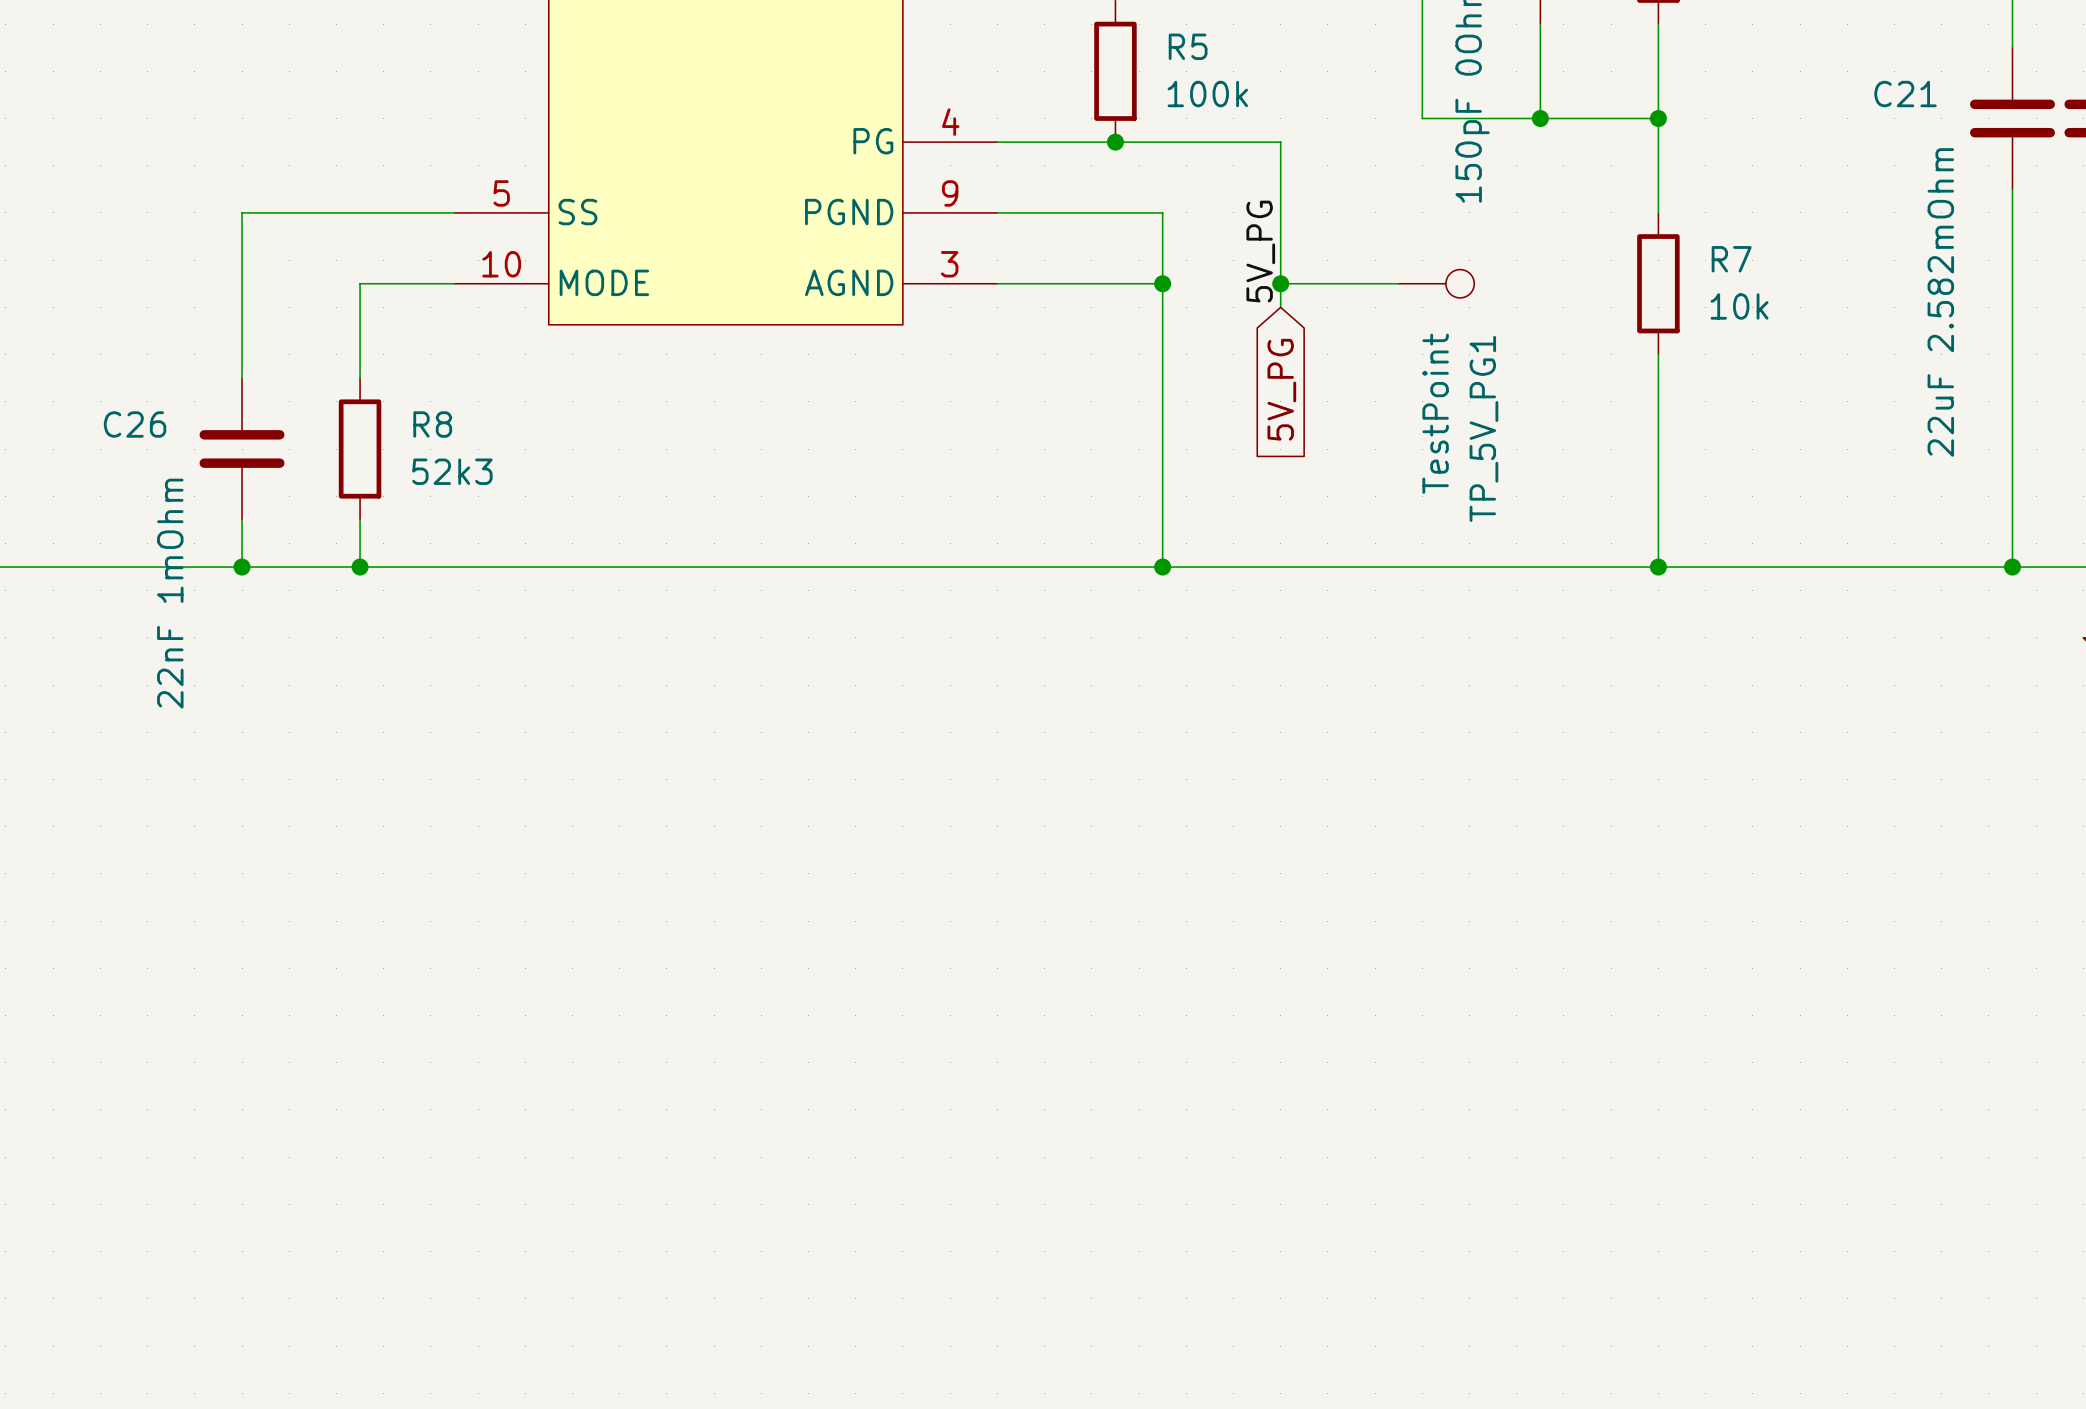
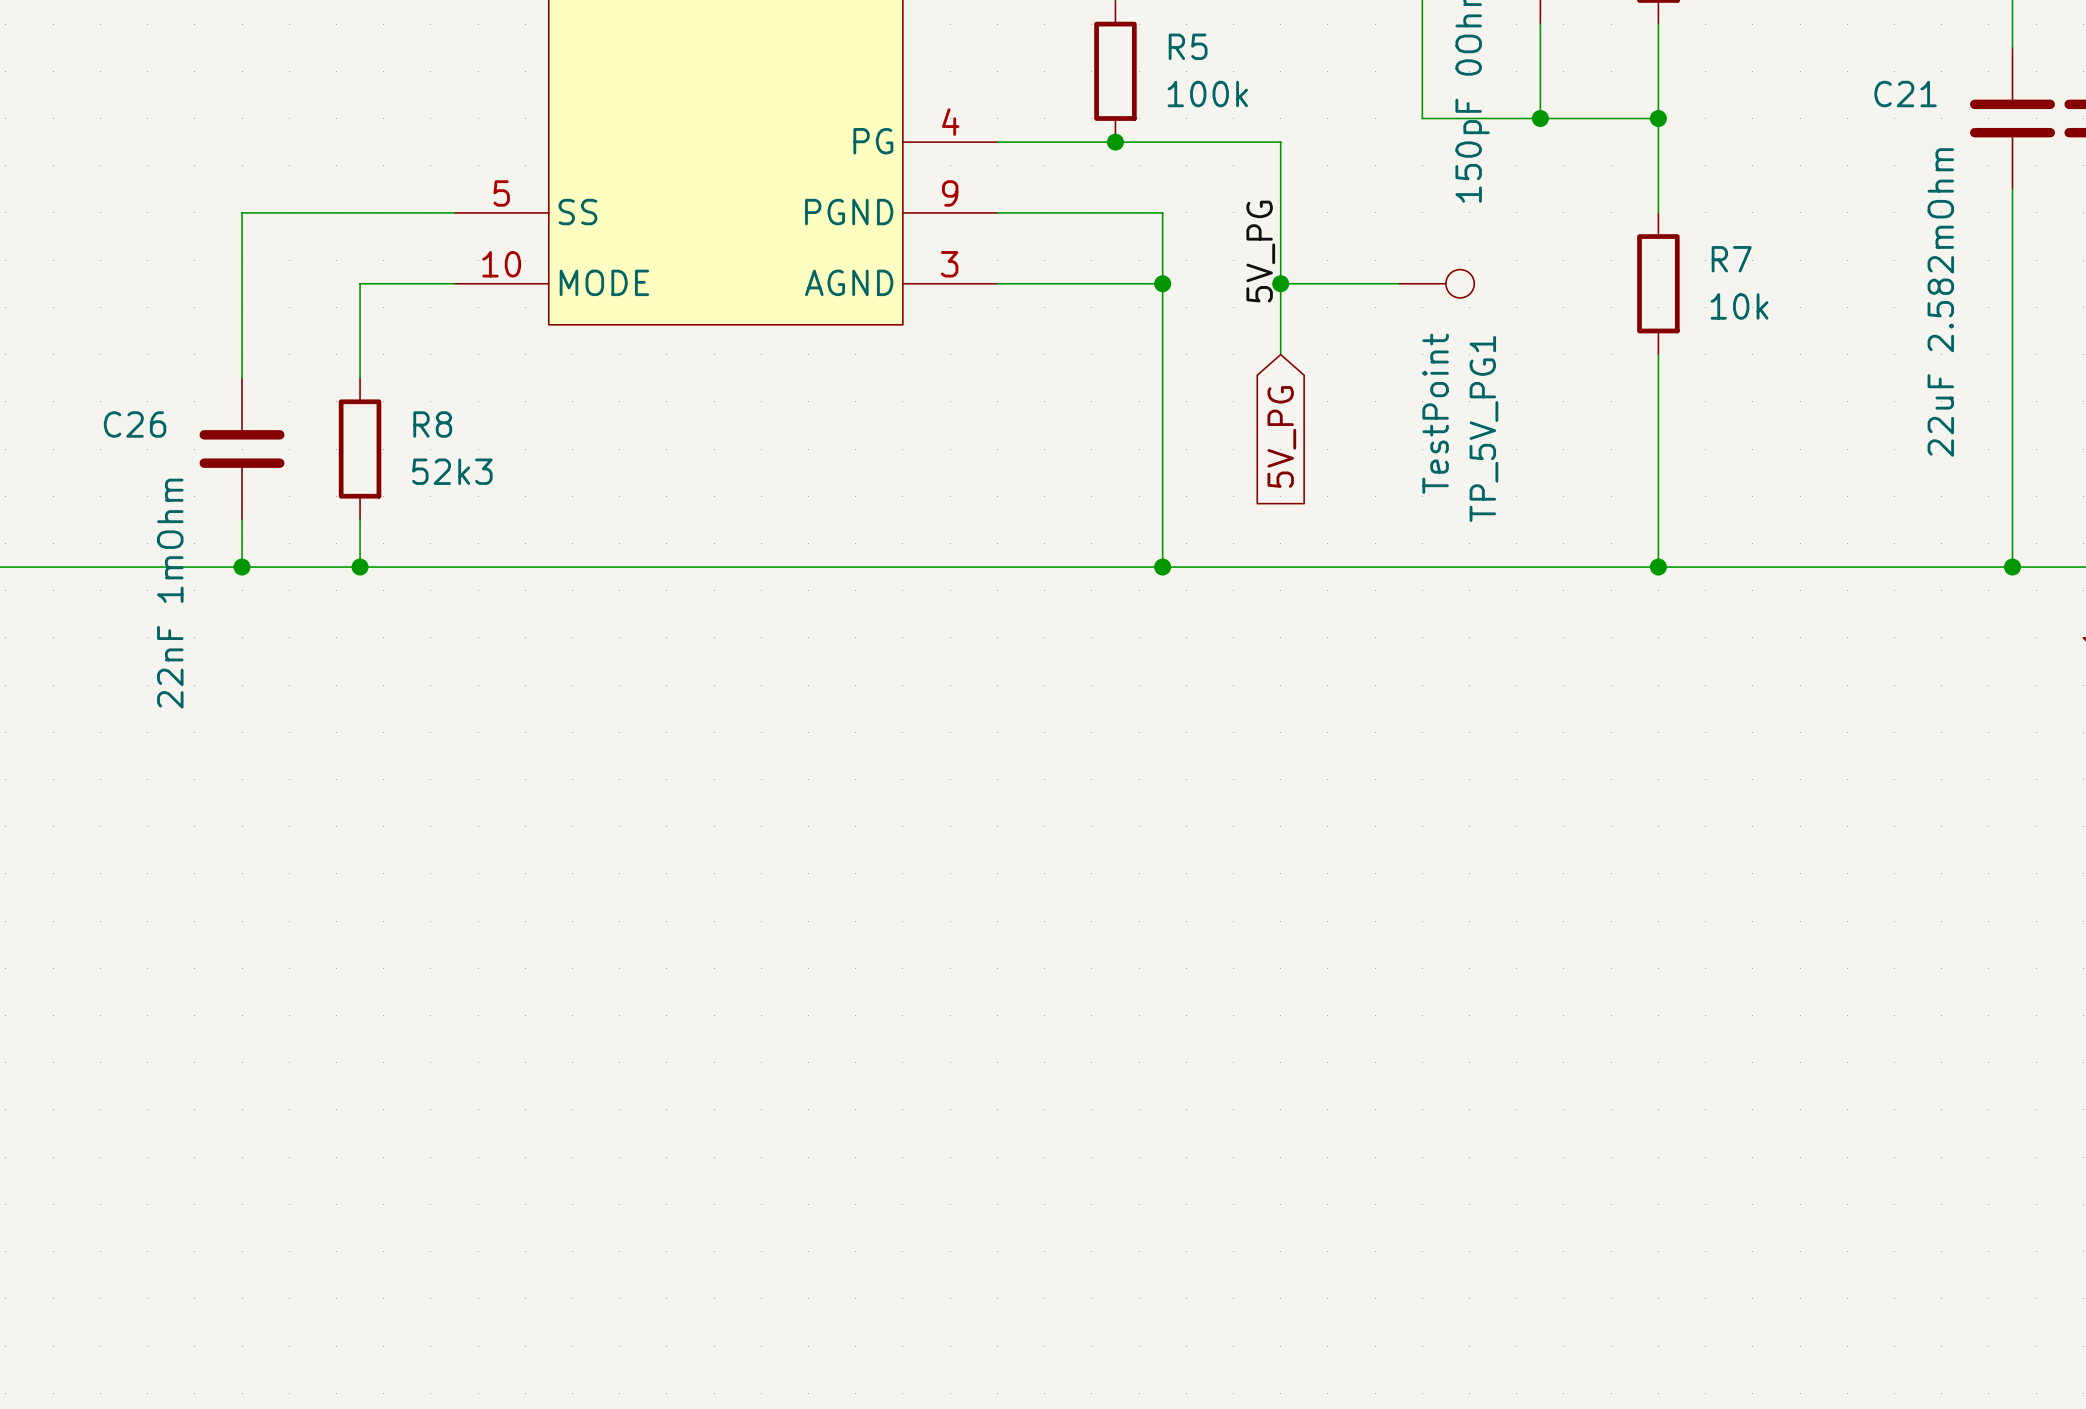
wire: none -> (1280, 307) (1280, 354)
global label position: 5V_PG (1281, 389) -> 5V_PG (1281, 436)

